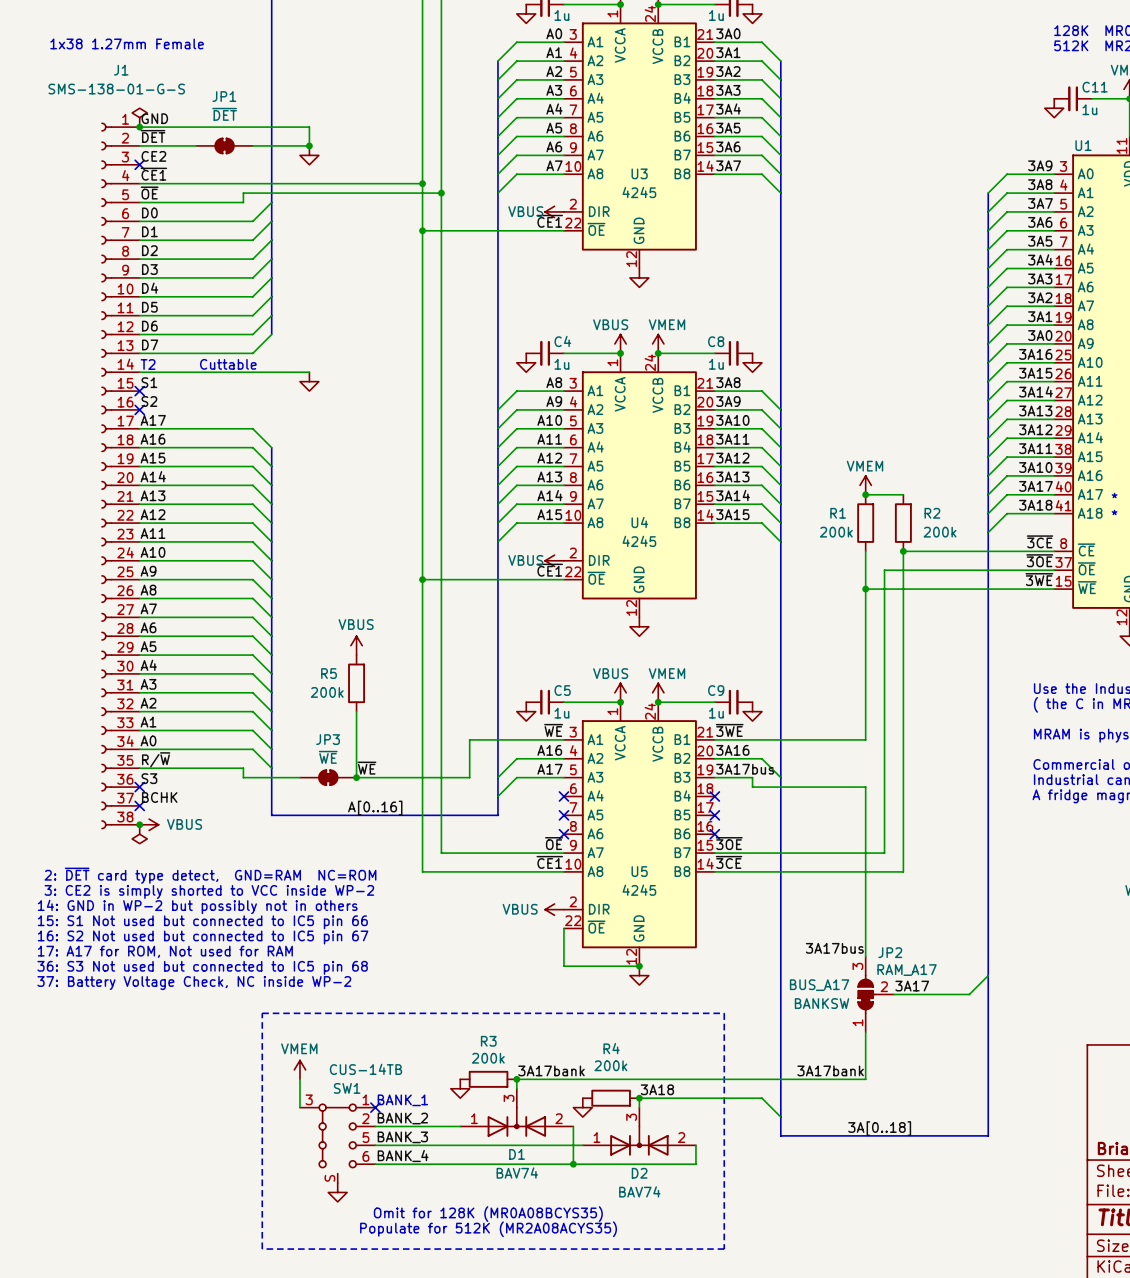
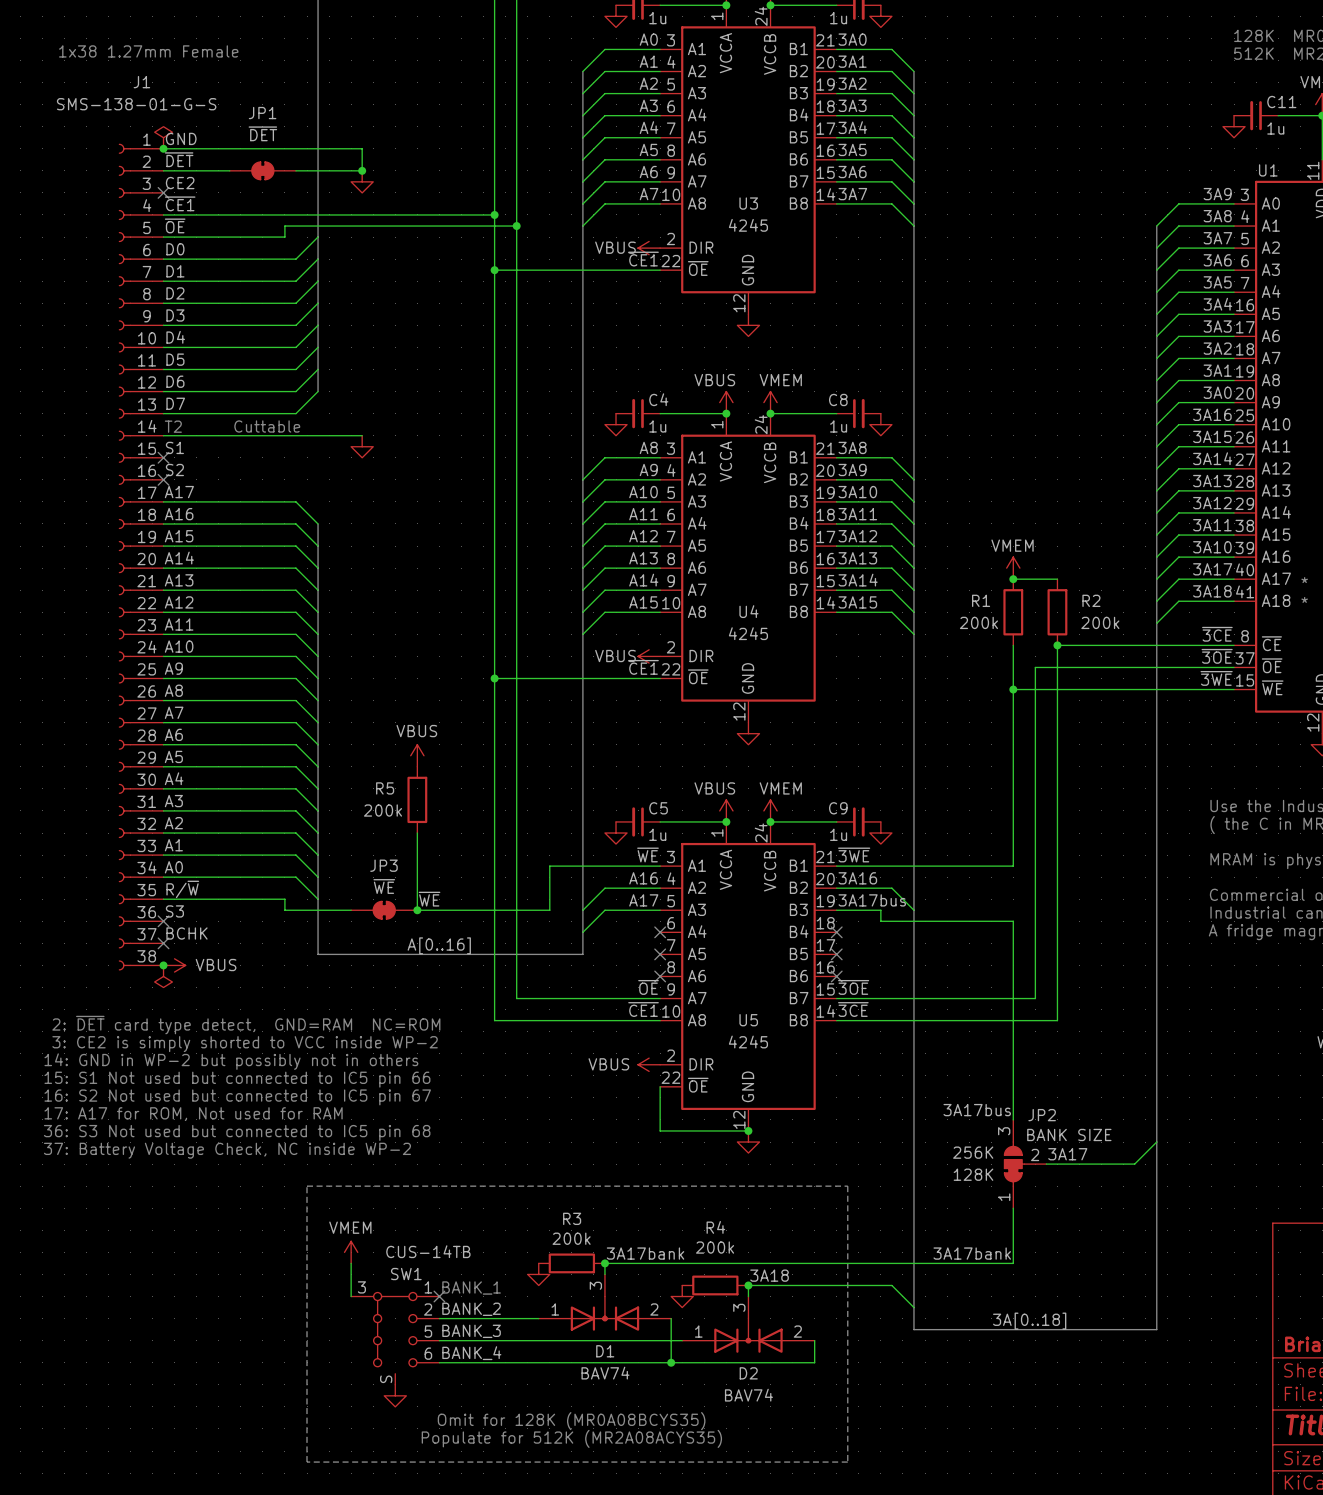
JP2 value: RAM_A17 (907, 970) -> BANK SIZE (1069, 1134)
JP2 text: BUS_A17 (819, 985) -> 256K (973, 1152)
JP2 text: BANKSW (822, 1003) -> 128K (973, 1174)

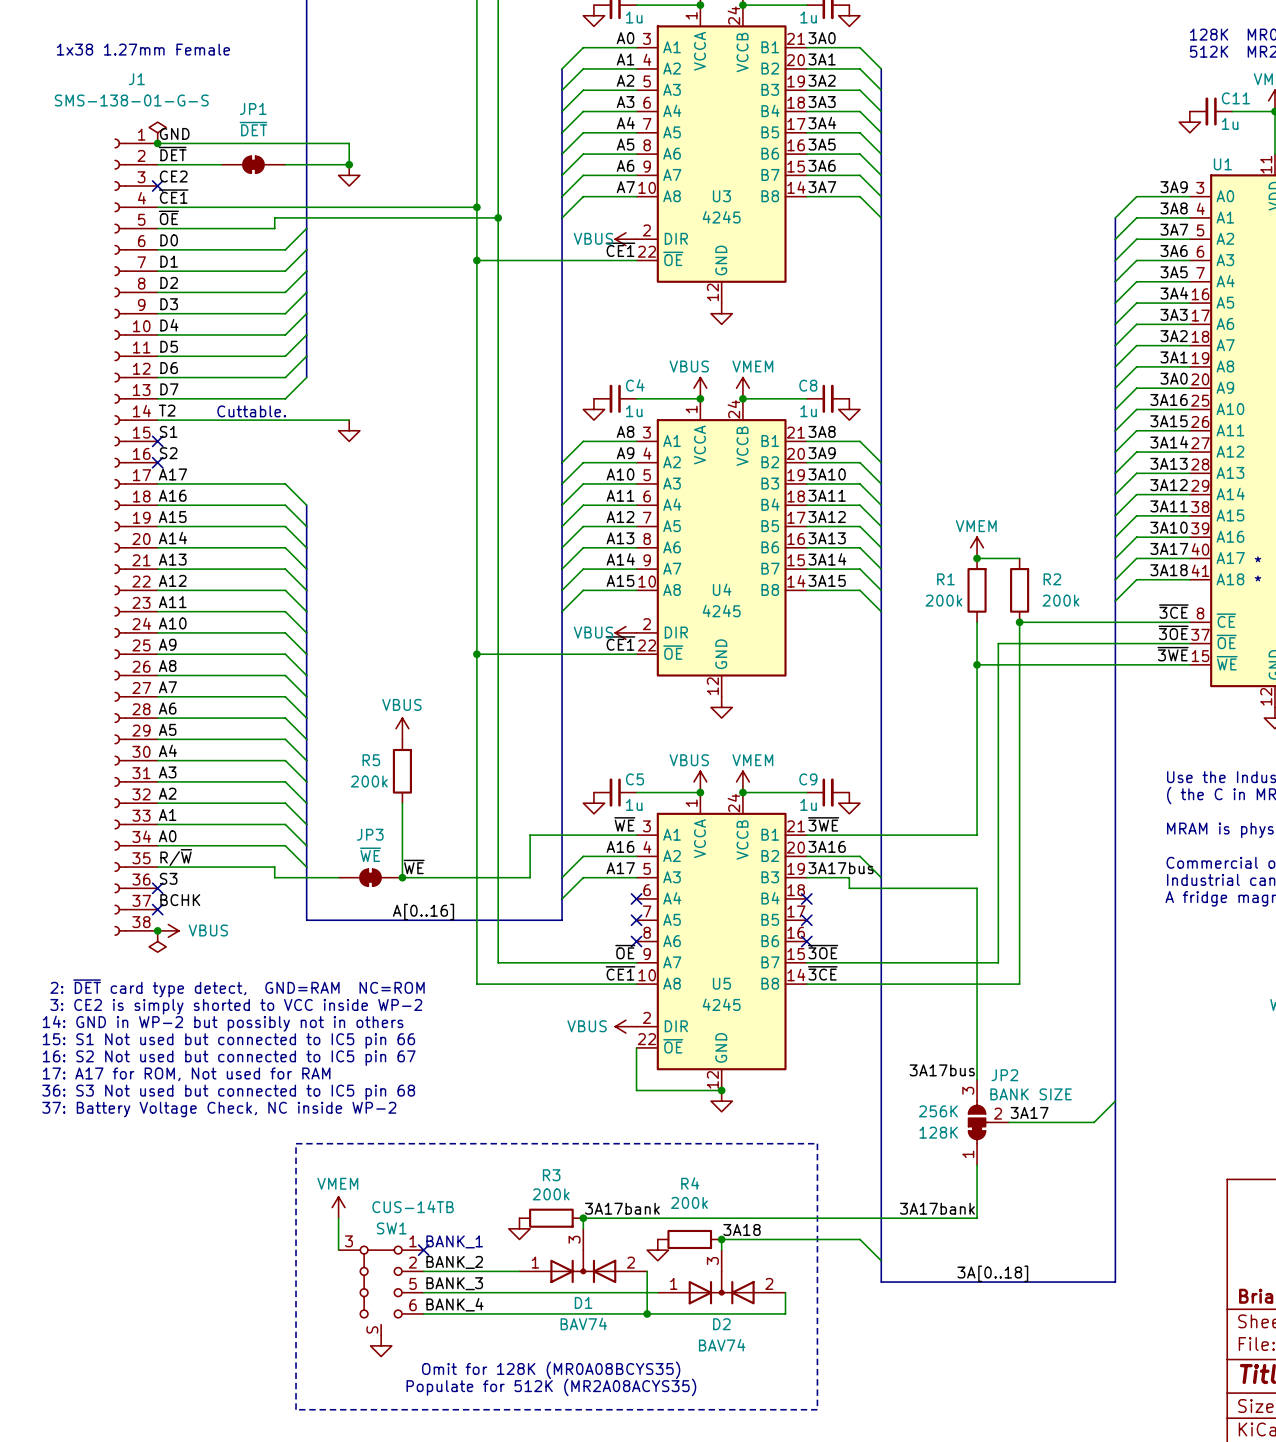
label: none -> T2 (167, 410)
text: T2 (173, 426) -> none
text: Cuttable (267, 426) -> Cuttable. (251, 411)

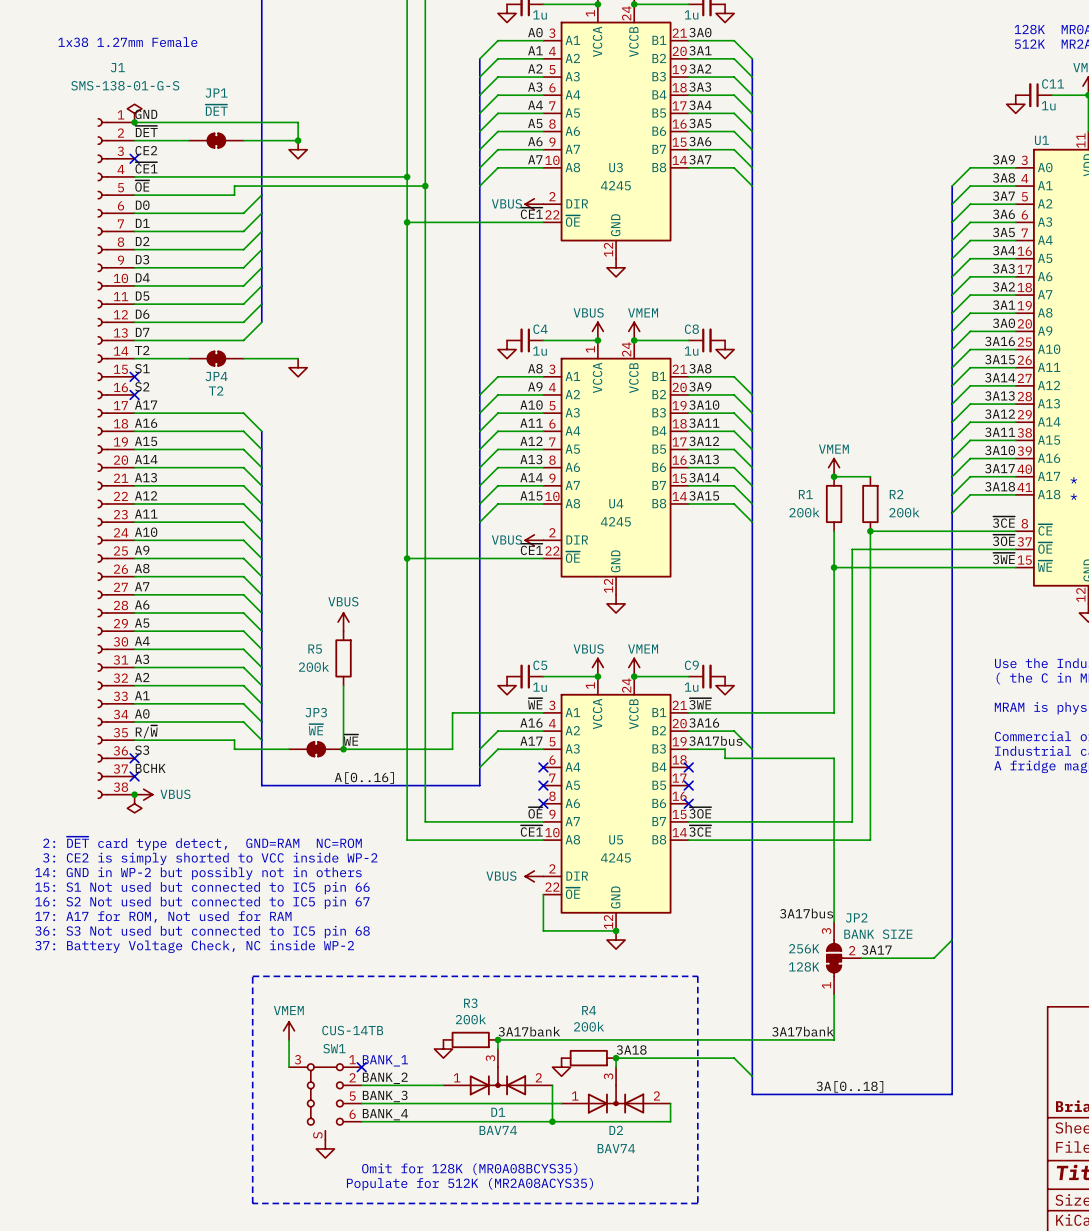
text: Cuttable. (251, 411) -> none
JP4: none -> T2 (216, 358)

